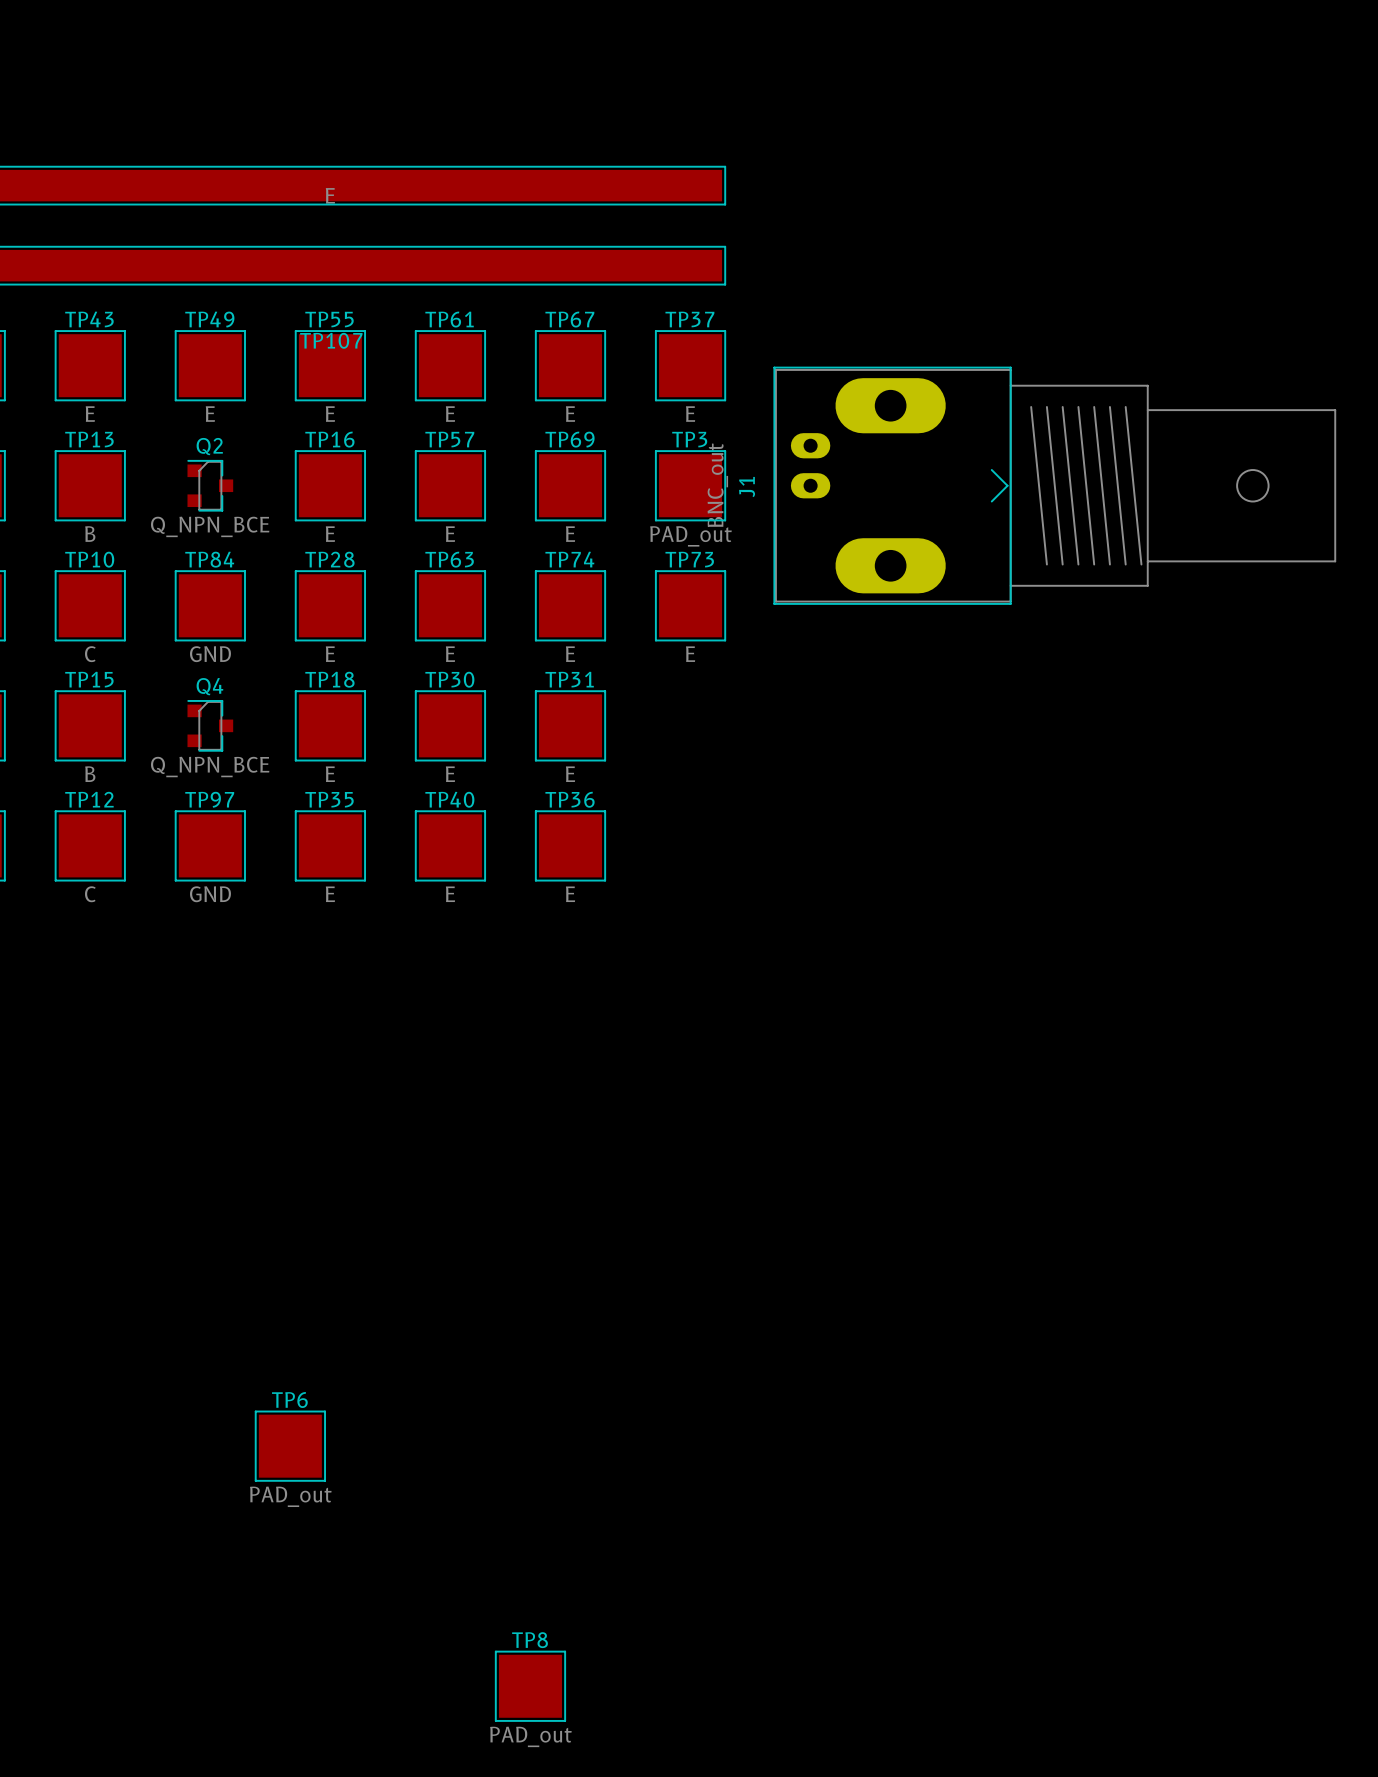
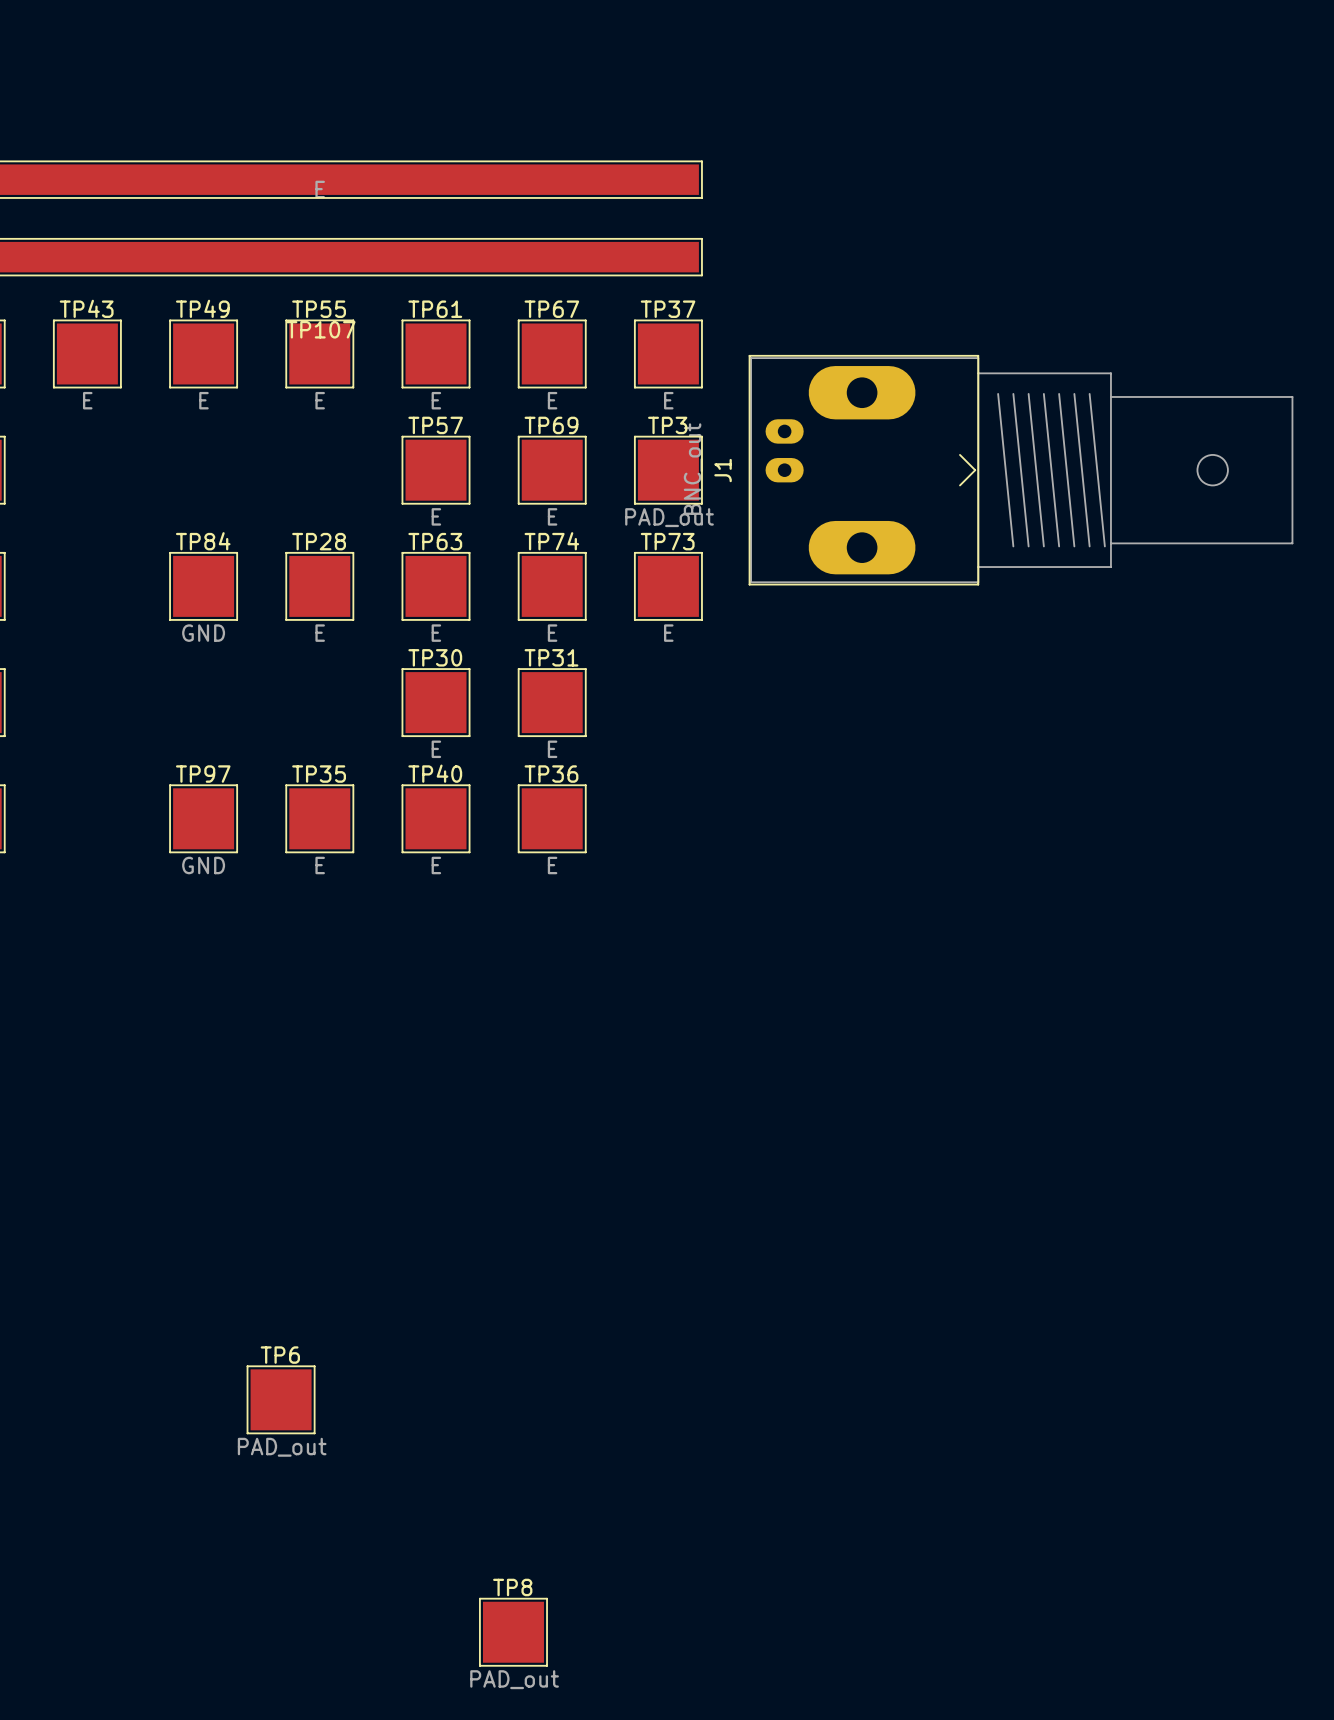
TP13: B (90, 485) -> none
Q2: Q_NPN_BCE (210, 485) -> none
TP16: E (330, 485) -> none
TP10: C (90, 605) -> none
TP15: B (90, 725) -> none
Q4: Q_NPN_BCE (210, 725) -> none
TP18: E (330, 725) -> none
TP12: C (90, 845) -> none

